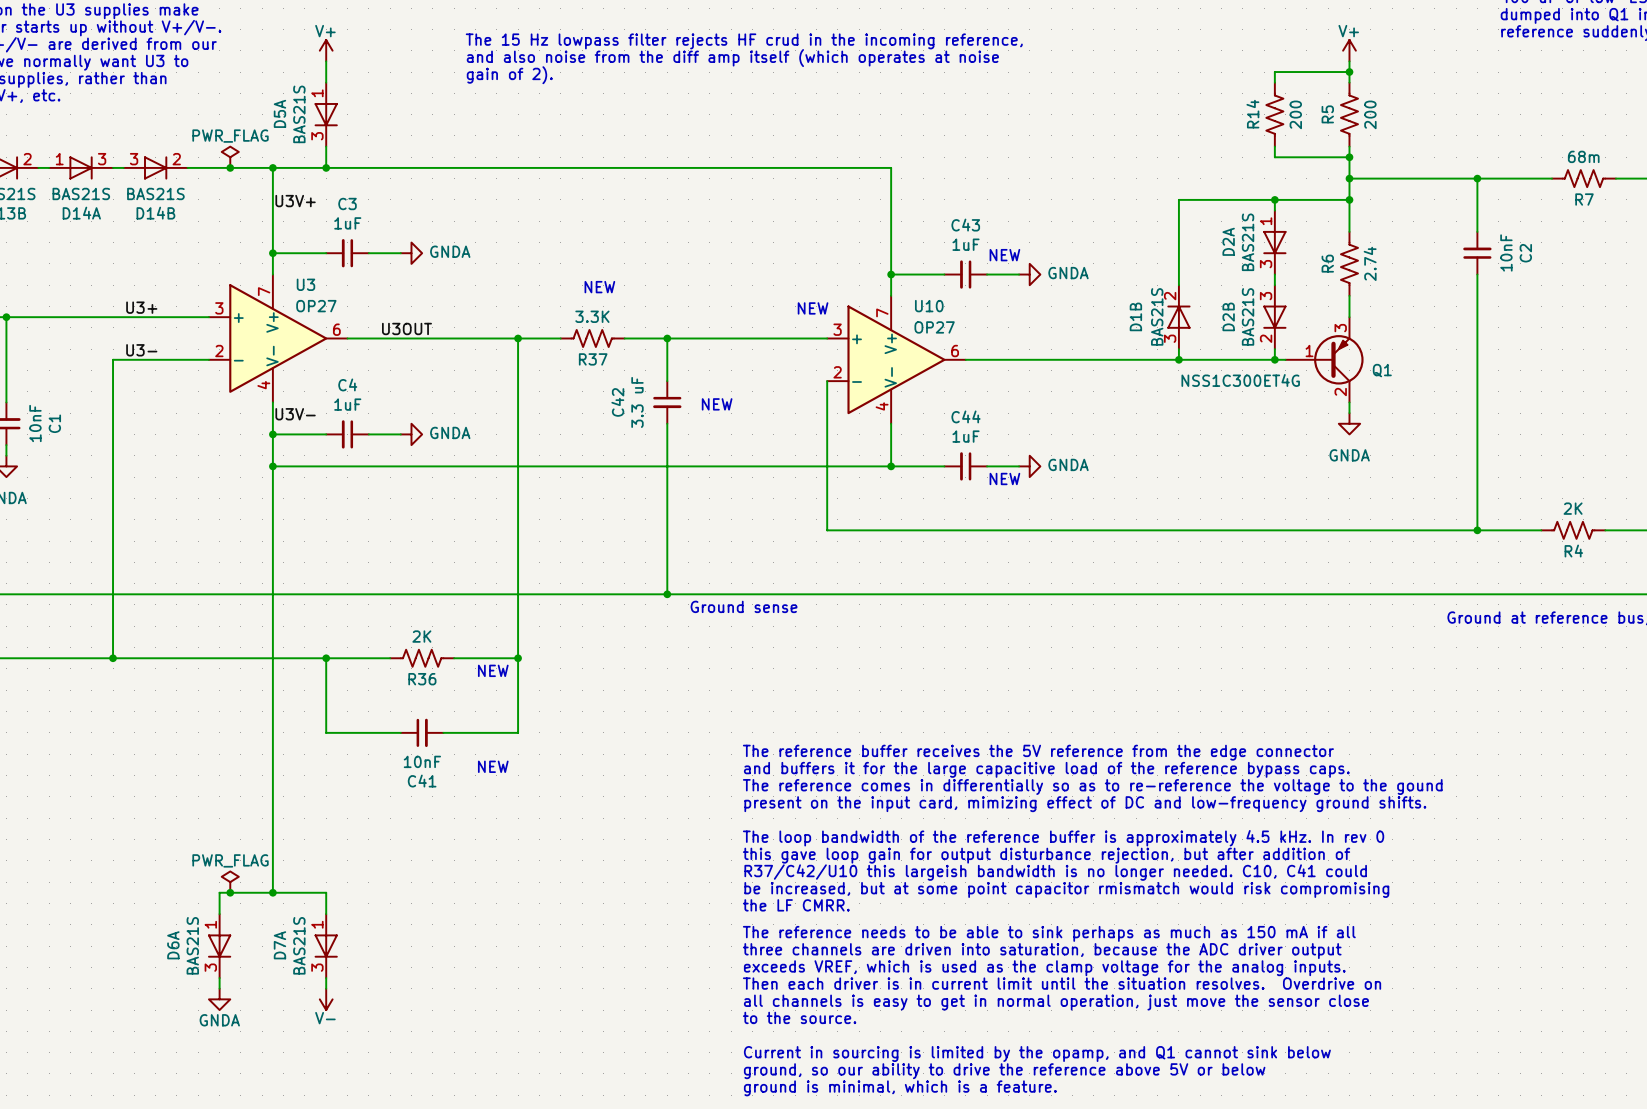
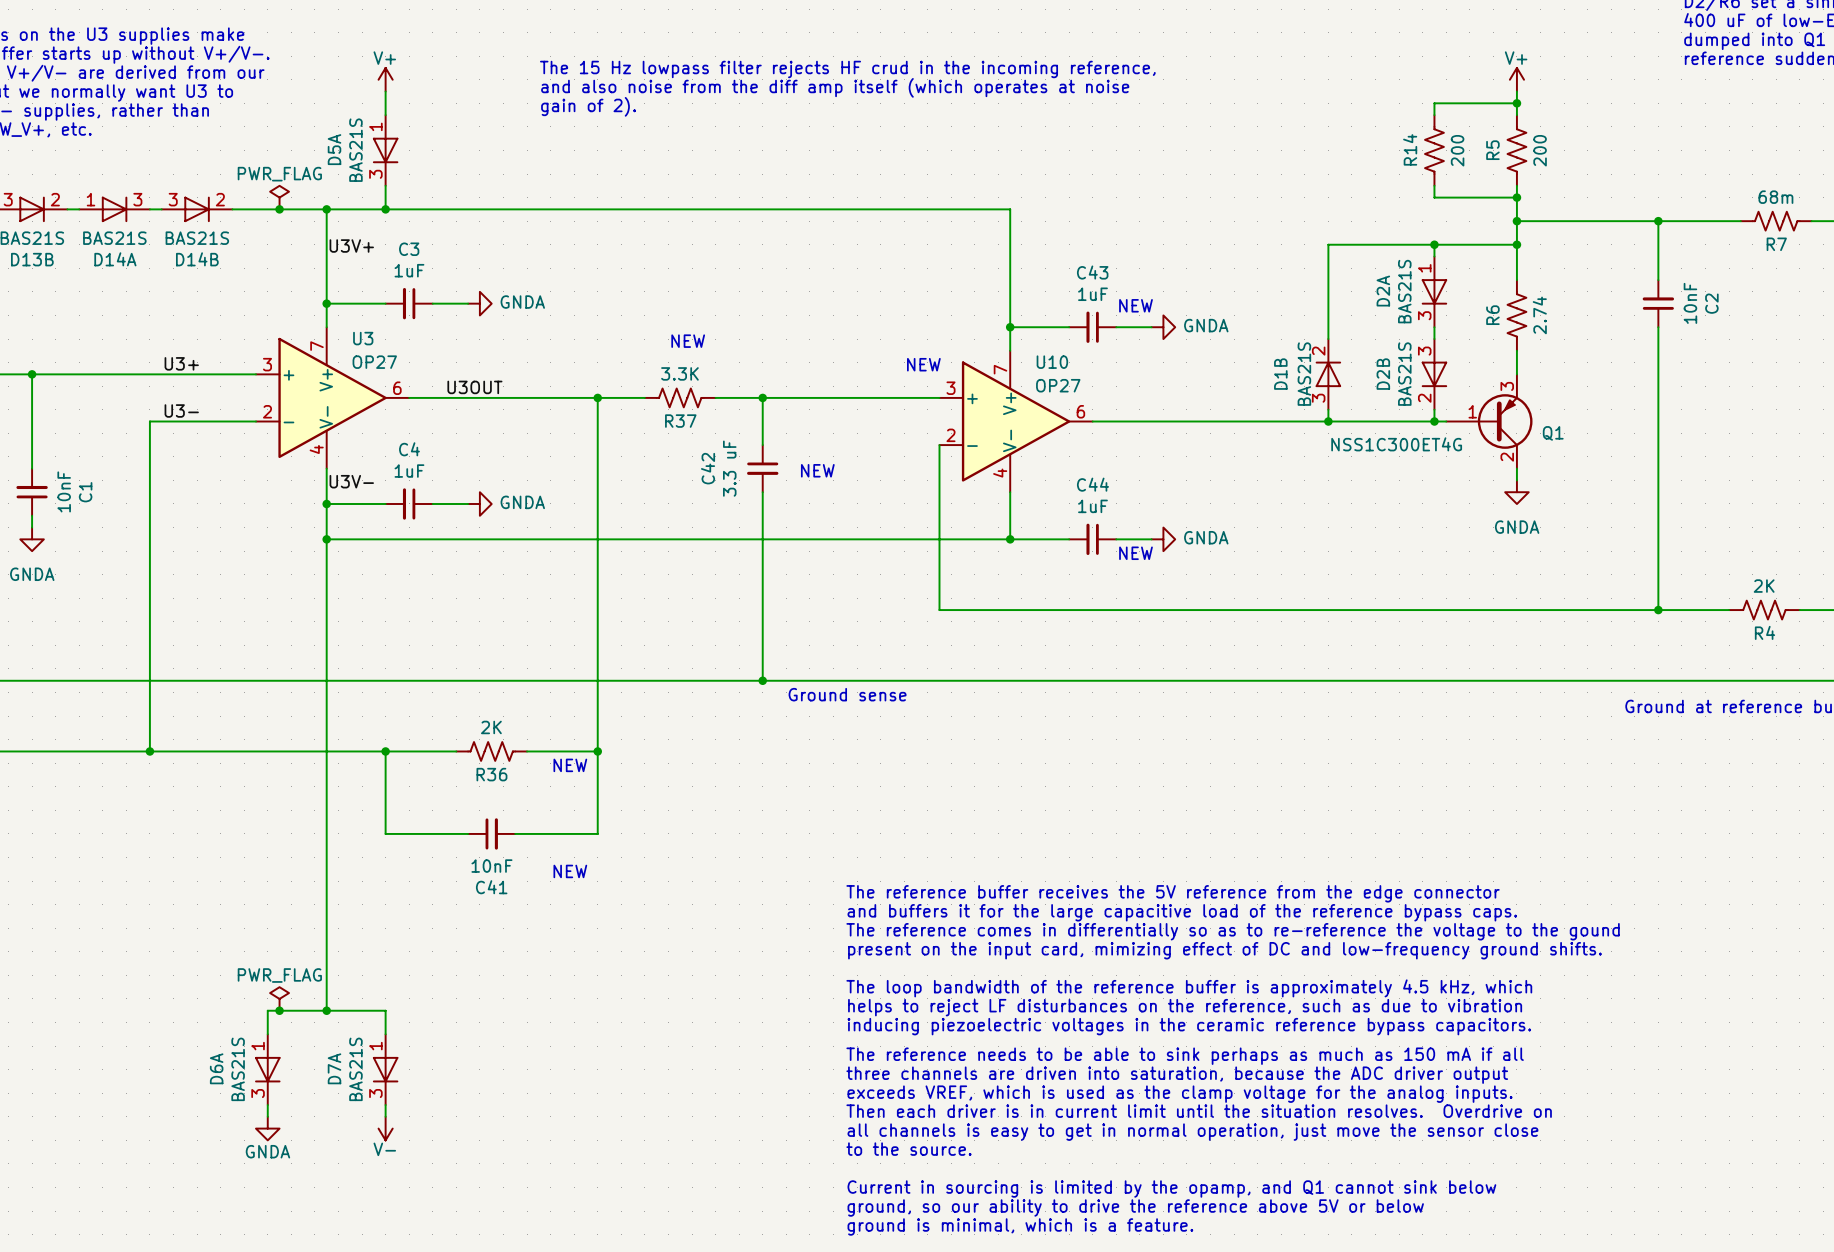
text: The reference buffer receives the 5V reference from the edge connector (1038, 752) -> none
text: and buffers it for the large capacitive load of the reference bypass caps. (1046, 769) -> none
text: The reference comes in differentially so as to re-reference the voltage to the gound (1092, 787) -> The reference buffer receives the 5V reference from the edge connector (1173, 893)
text: present on the input card, mimizing effect of DC and low-frequency ground shifts. (1085, 804) -> and buffers it for the large capacitive load of the reference bypass caps. (1182, 912)
text: none -> The reference comes in differentially so as to re-reference the voltage to the gound (1233, 931)
text: The loop bandwidth of the reference buffer is approximately 4.5 kHz. In rev 0 (1063, 838) -> present on the input card, mimizing effect of DC and low-frequency ground shifts. (1224, 950)
text: this gave loop gain for output disturbance rejection, but after addition of (1046, 855) -> none
text: R37/C42/U10 this largeish bandwidth is no longer needed. C10, C41 could (1055, 872) -> The loop bandwidth of the reference buffer is approximately 4.5 kHz, which (1189, 988)
text: be increased, but at some point capacitor rmismatch would risk compromising (1066, 889) -> helps to reject LF disturbances on the reference, such as due to vibration (1185, 1007)
text: the LF CMRR. (796, 905) -> inducing piezoelectric voltages in the ceramic reference bypass capacitors. (1189, 1026)

